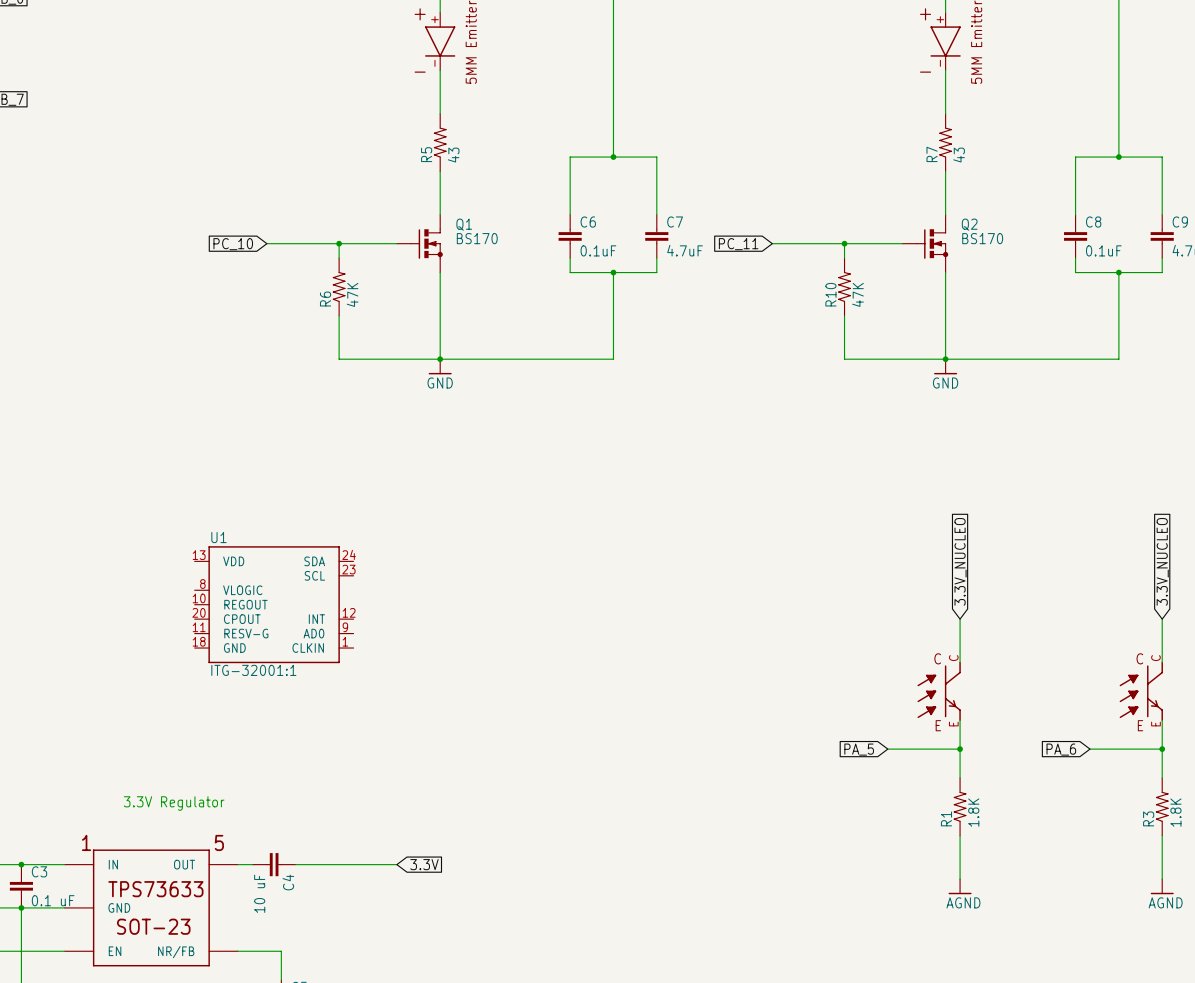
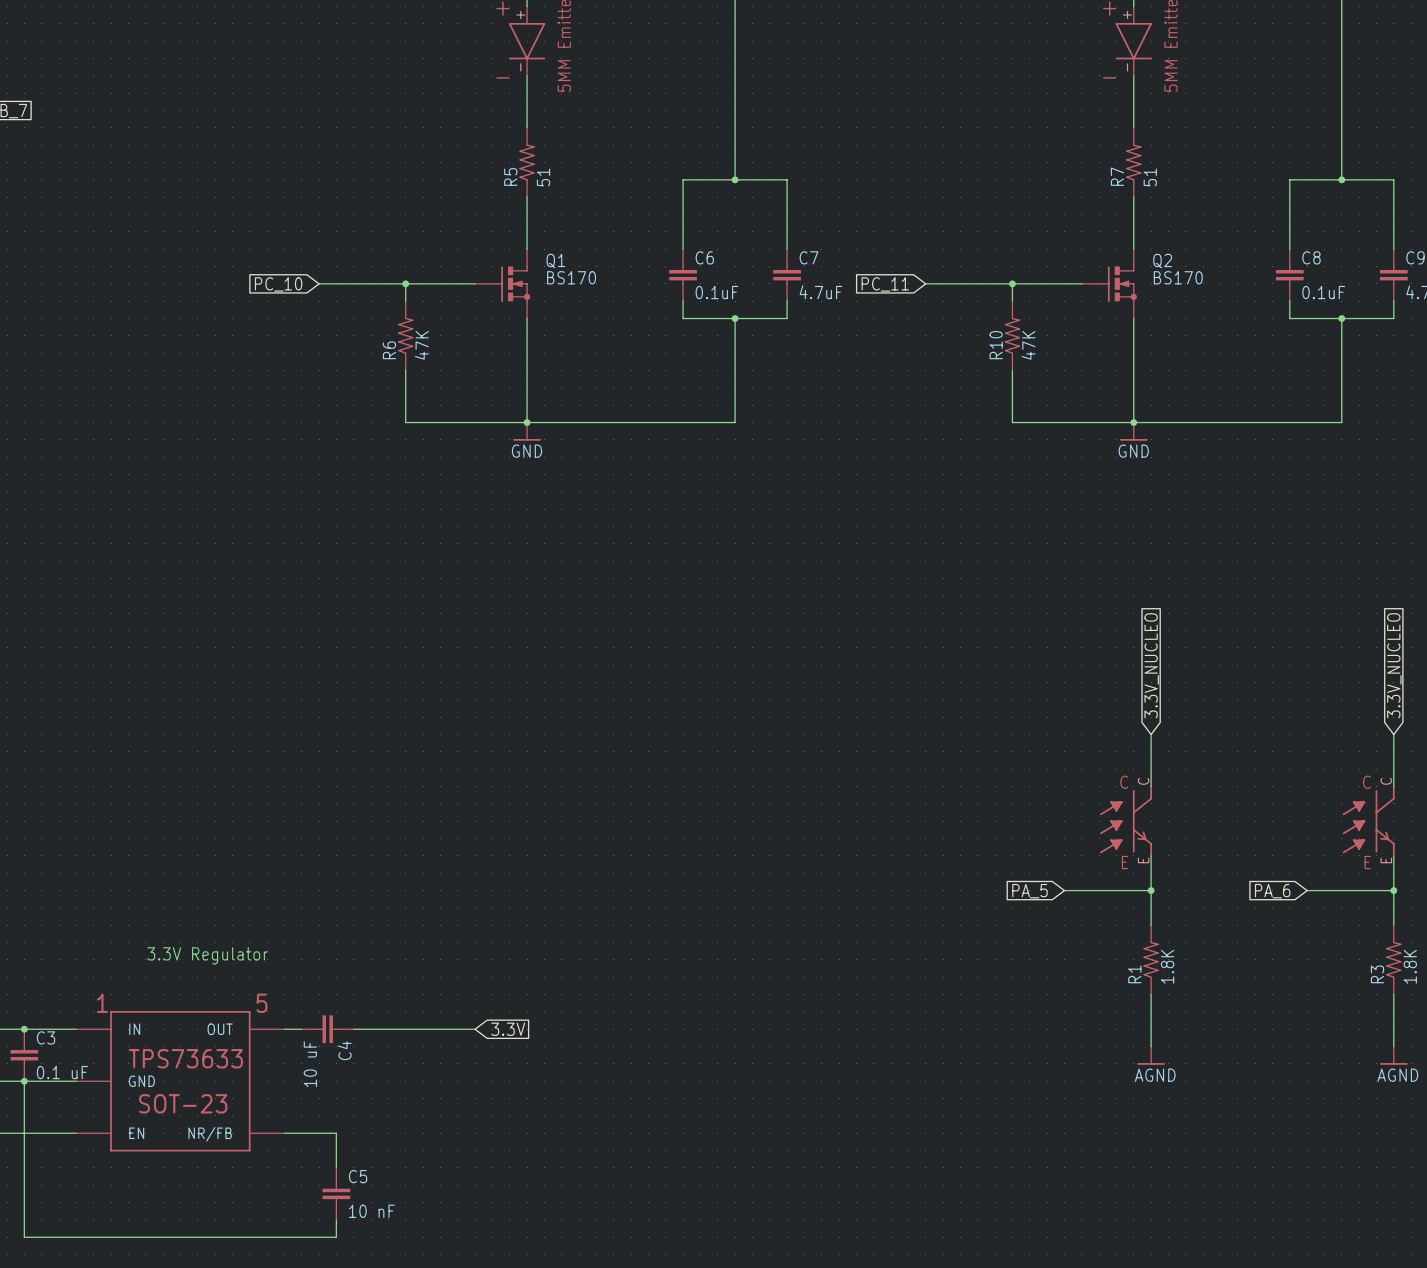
R5 value: 43 (453, 155) -> 51 (543, 177)
R7 value: 43 (959, 155) -> 51 (1150, 177)
U1: ITG-32001:1 (274, 604) -> none

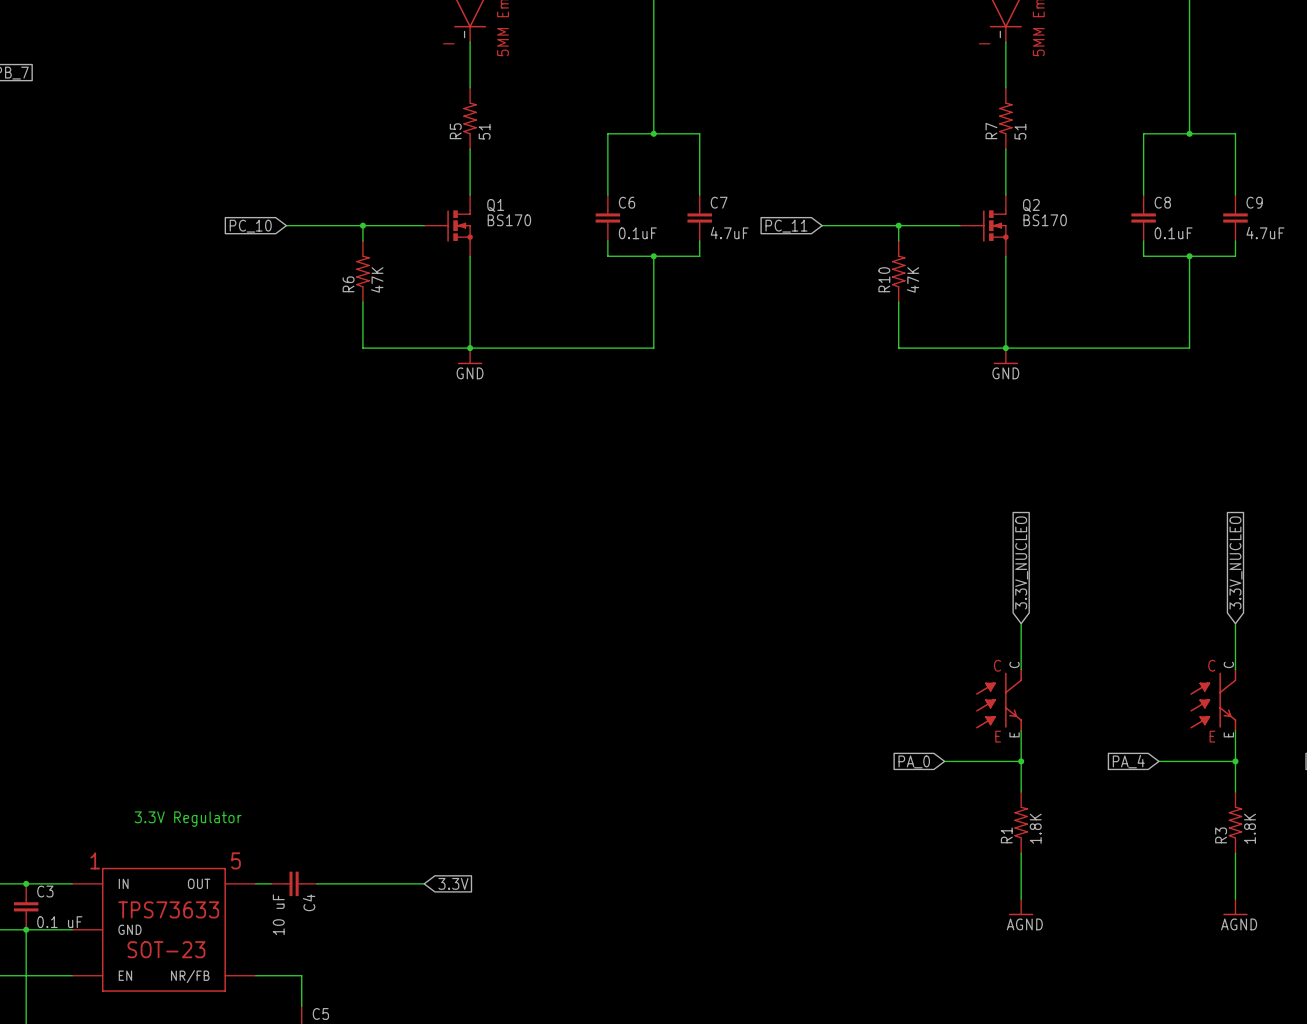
global label: PA_5 (1029, 891) -> PA_0 (914, 761)
global label: PA_6 (1272, 891) -> PA_4 (1128, 761)

